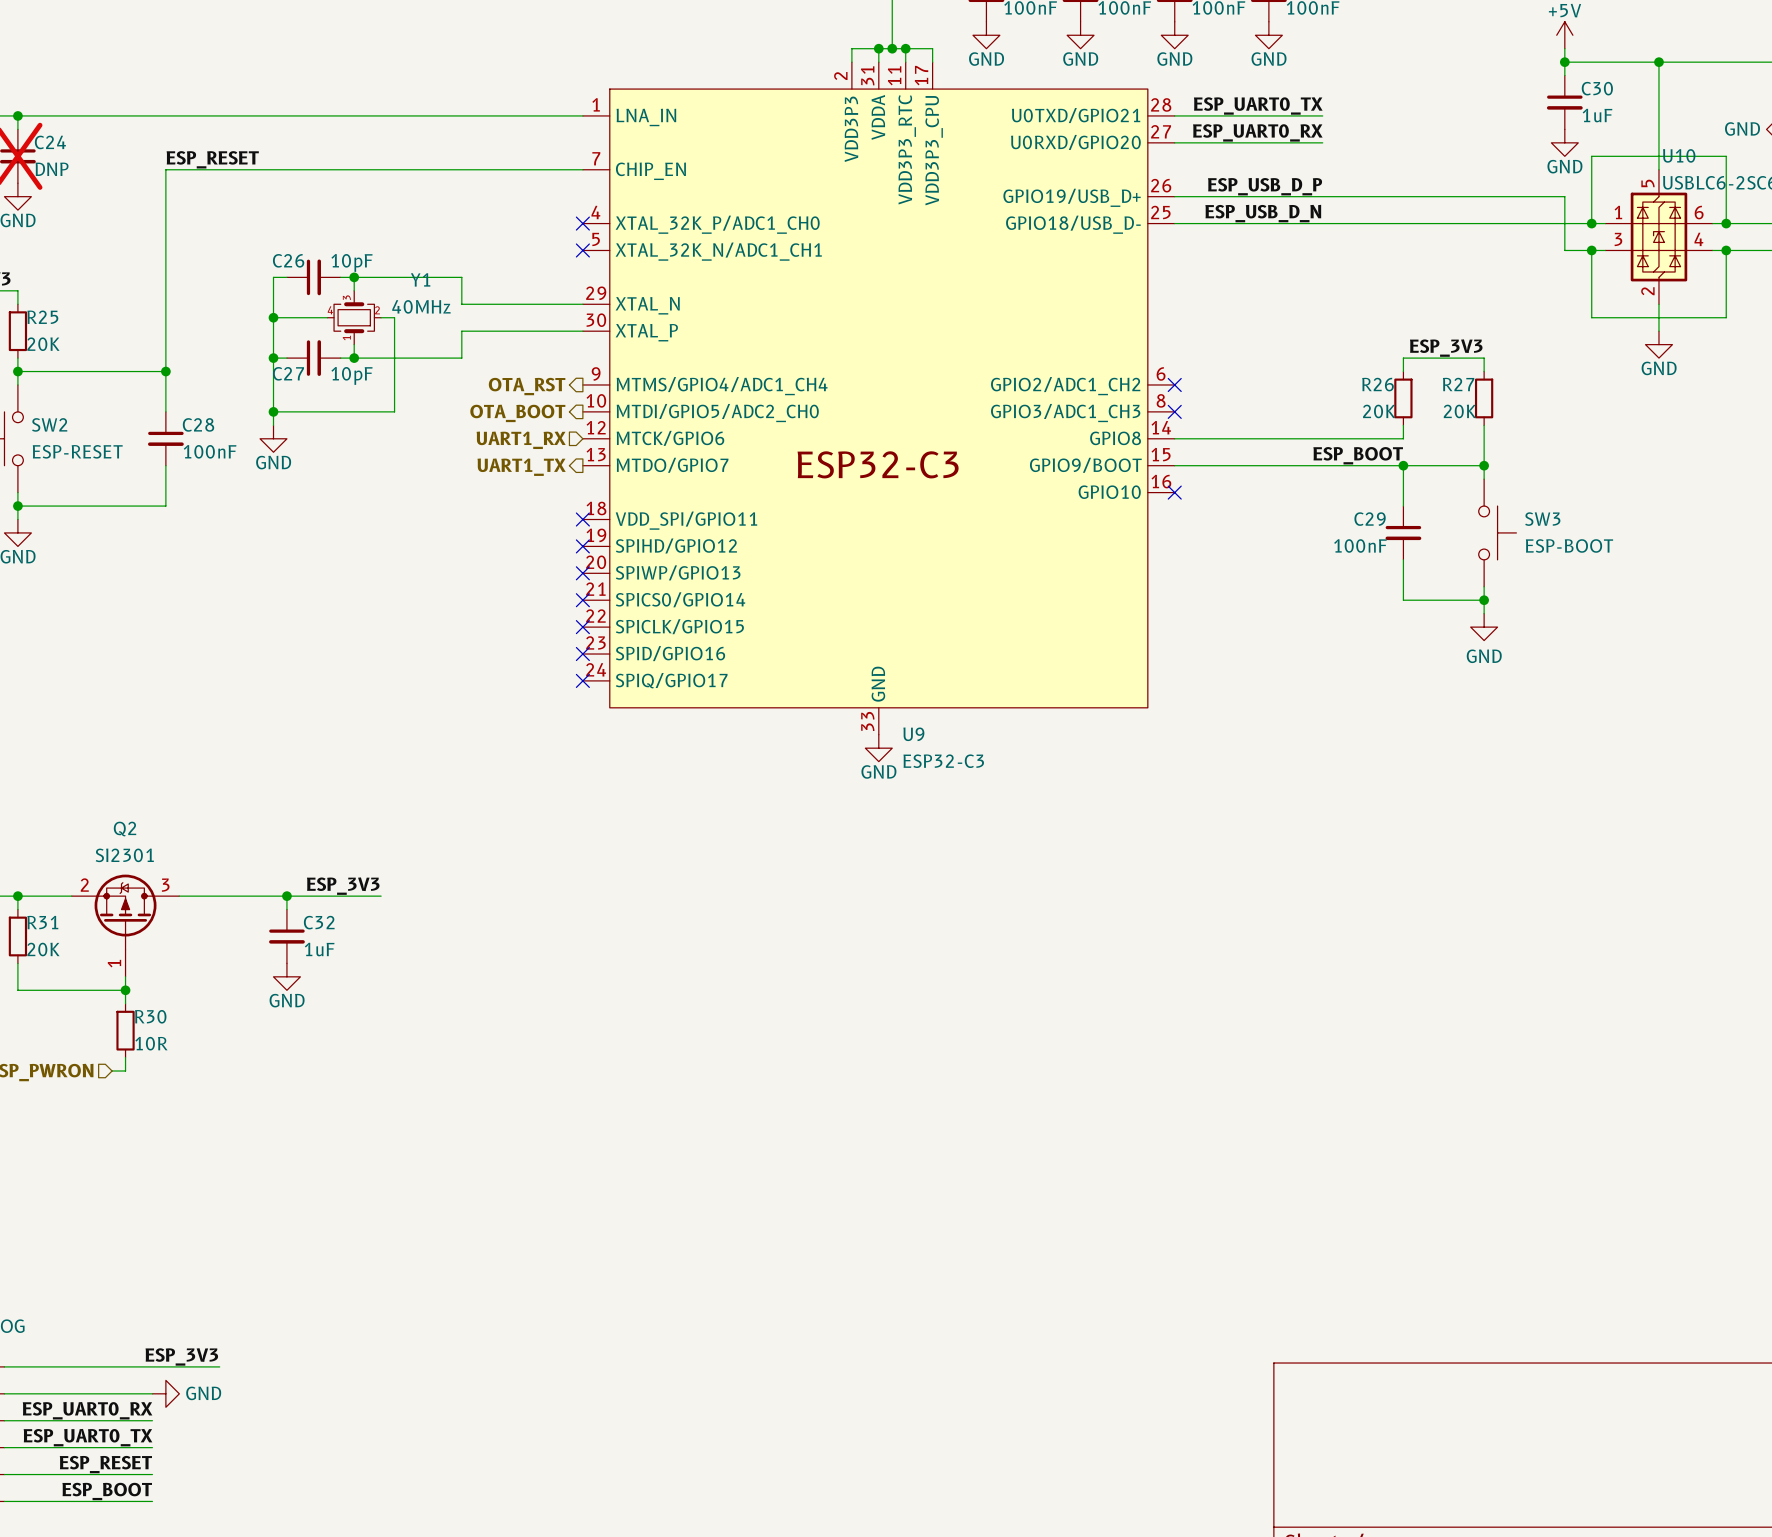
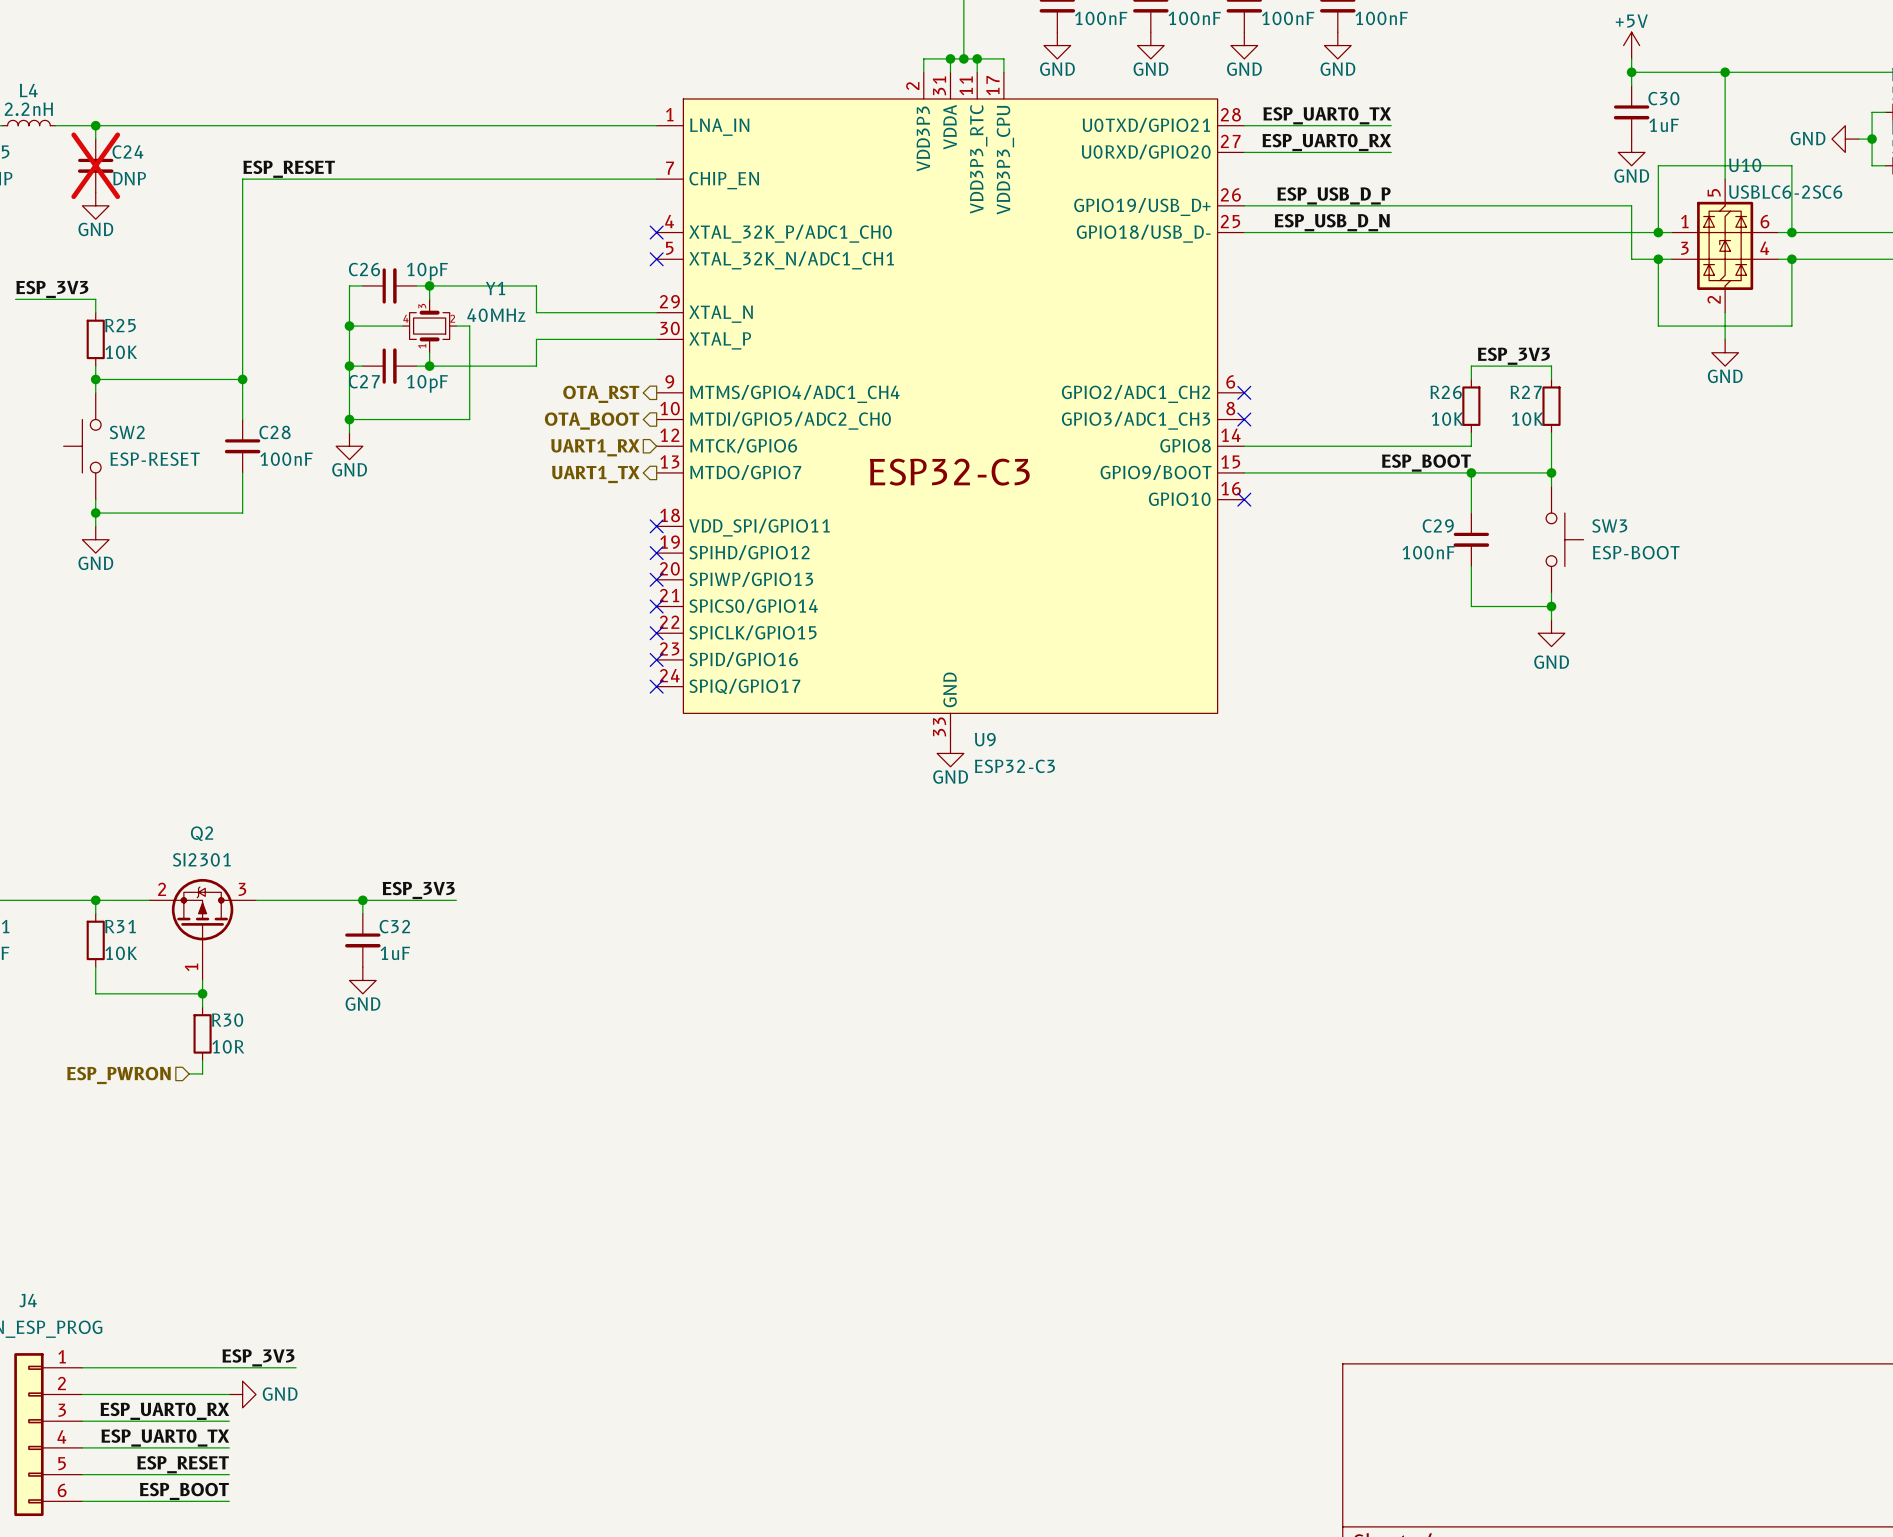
R25 value: 20K (43, 344) -> 10K (121, 352)
R26 value: 20K (1379, 411) -> 10K (1447, 419)
R27 value: 20K (1459, 411) -> 10K (1527, 419)
R31 value: 20K (43, 949) -> 10K (121, 953)

